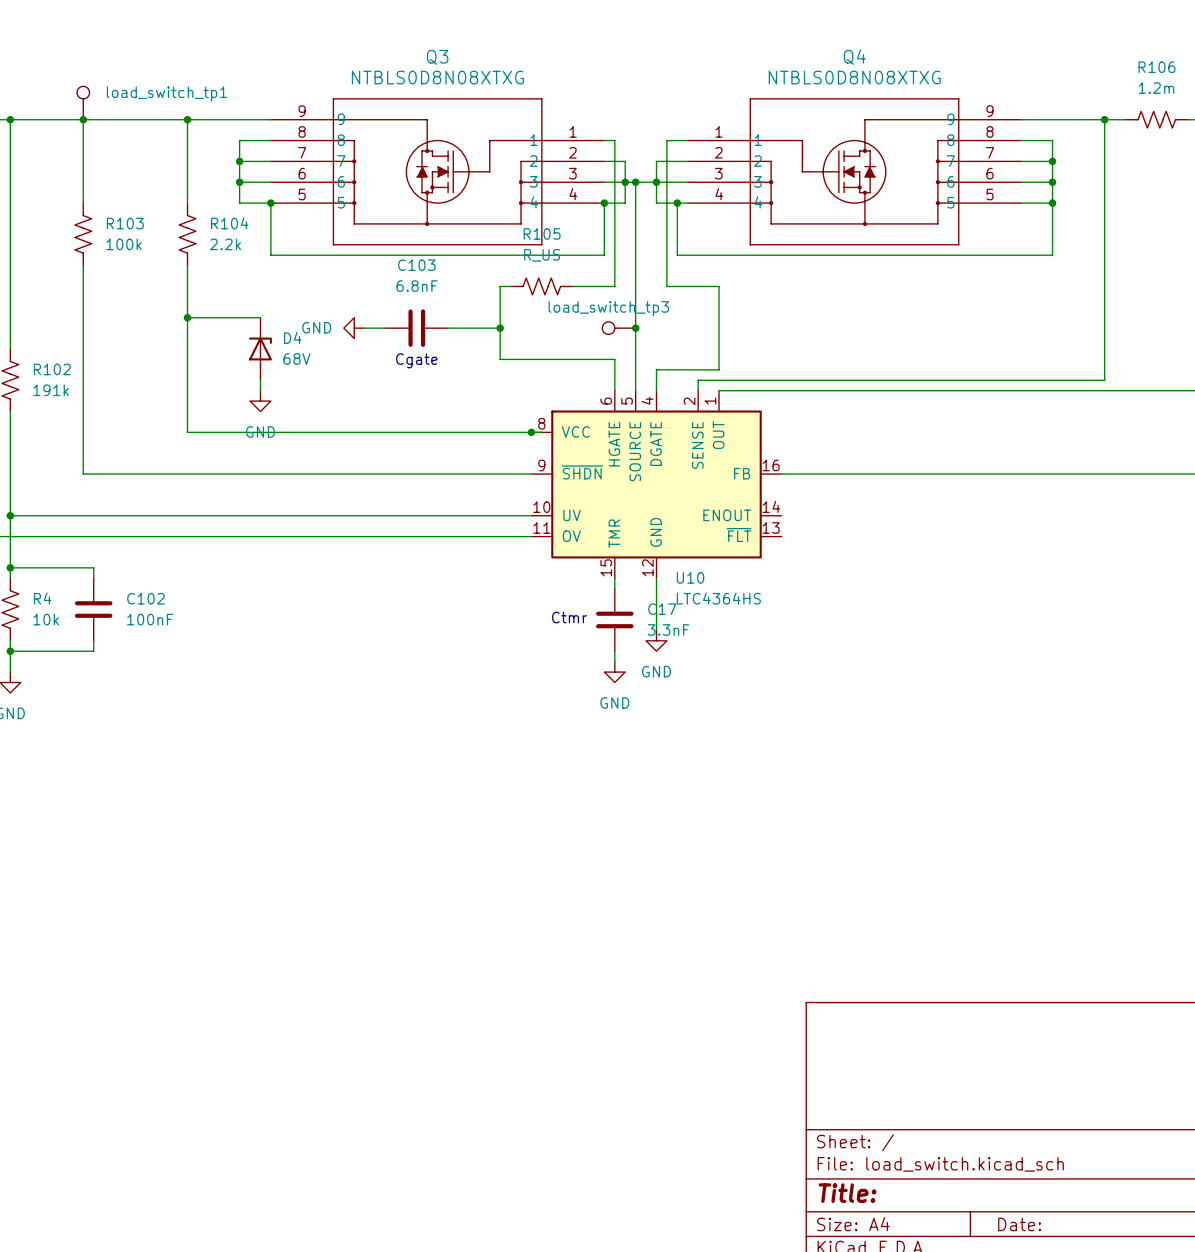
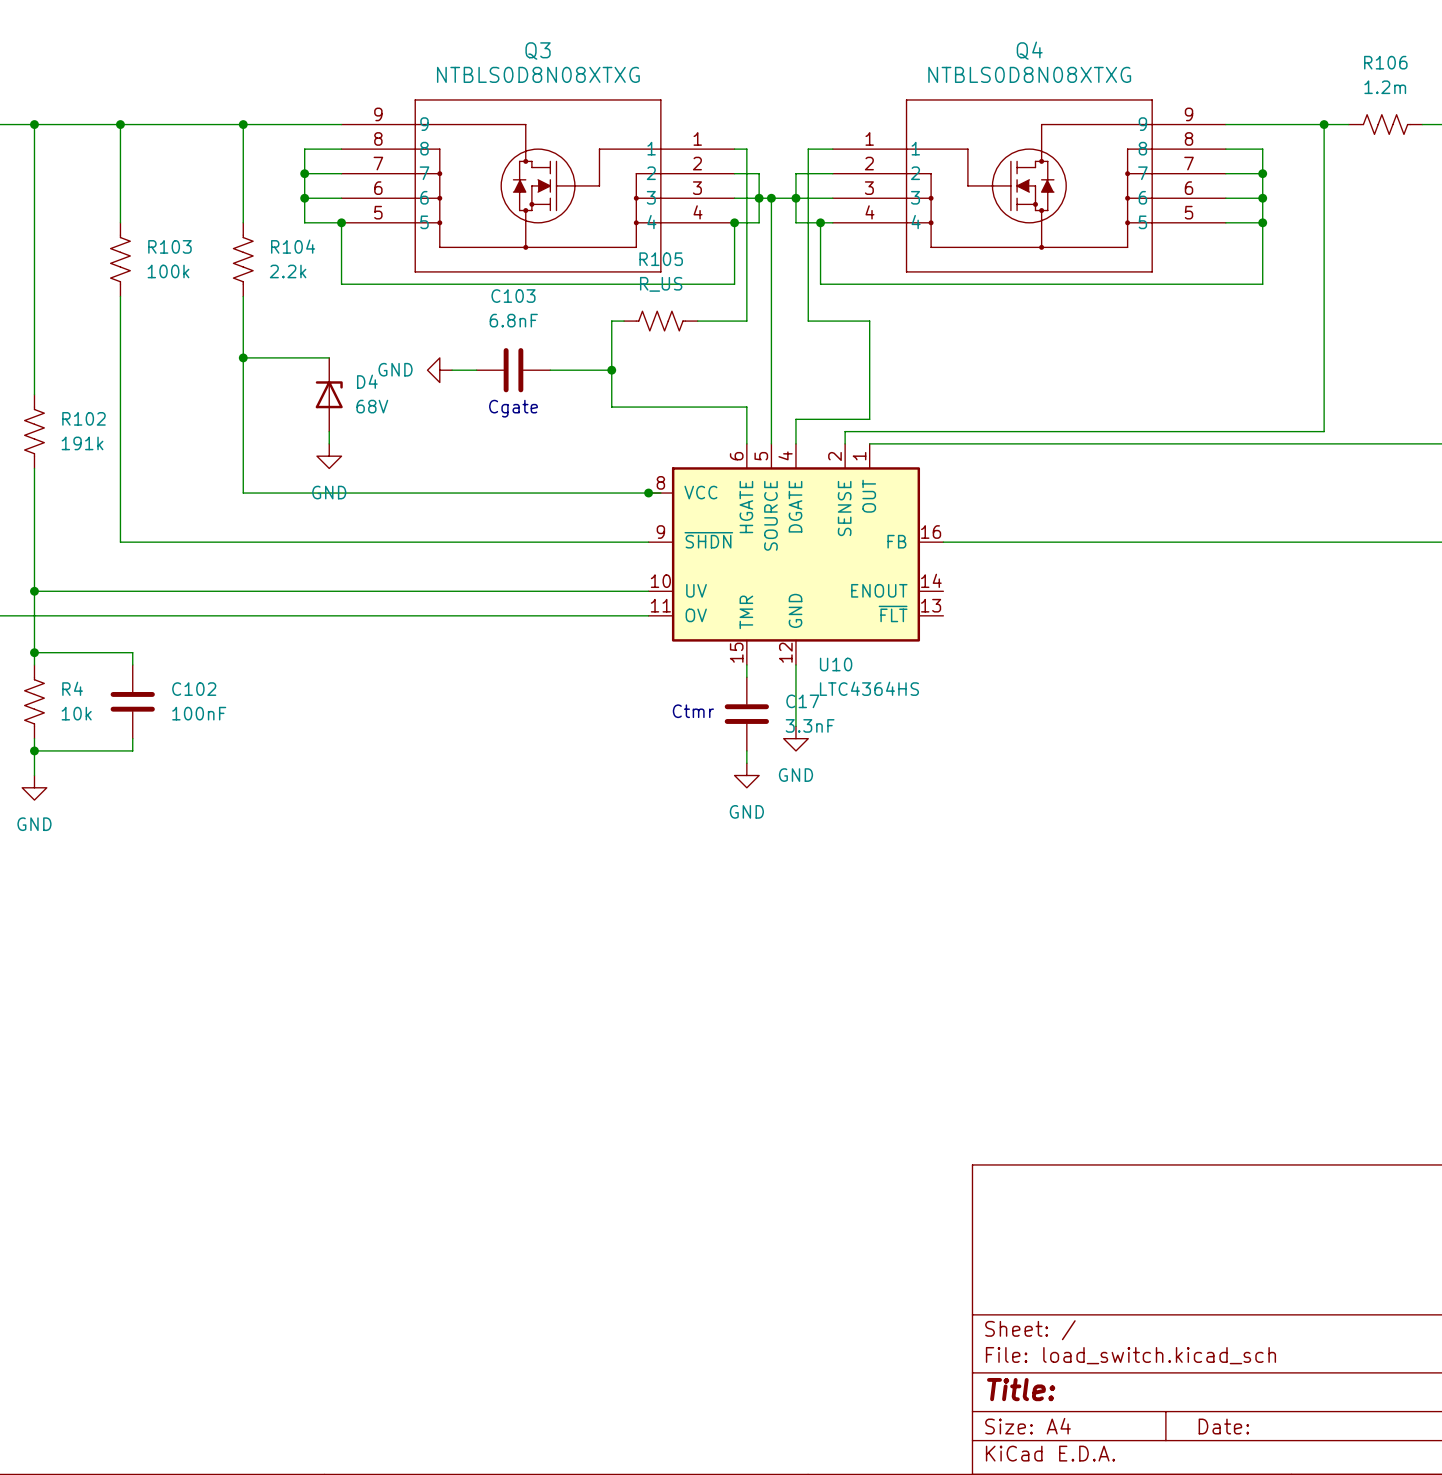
load_switch_tp1: (83, 103) -> none
load_switch_tp3: (618, 328) -> none
junction: (635, 328) -> none

